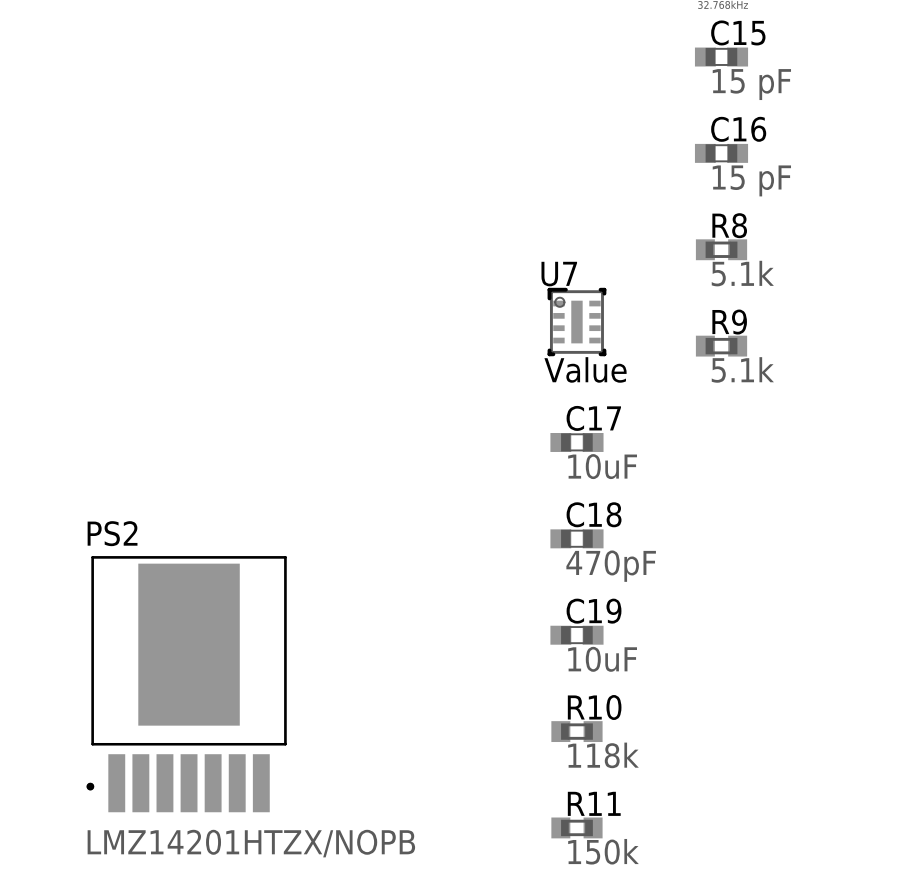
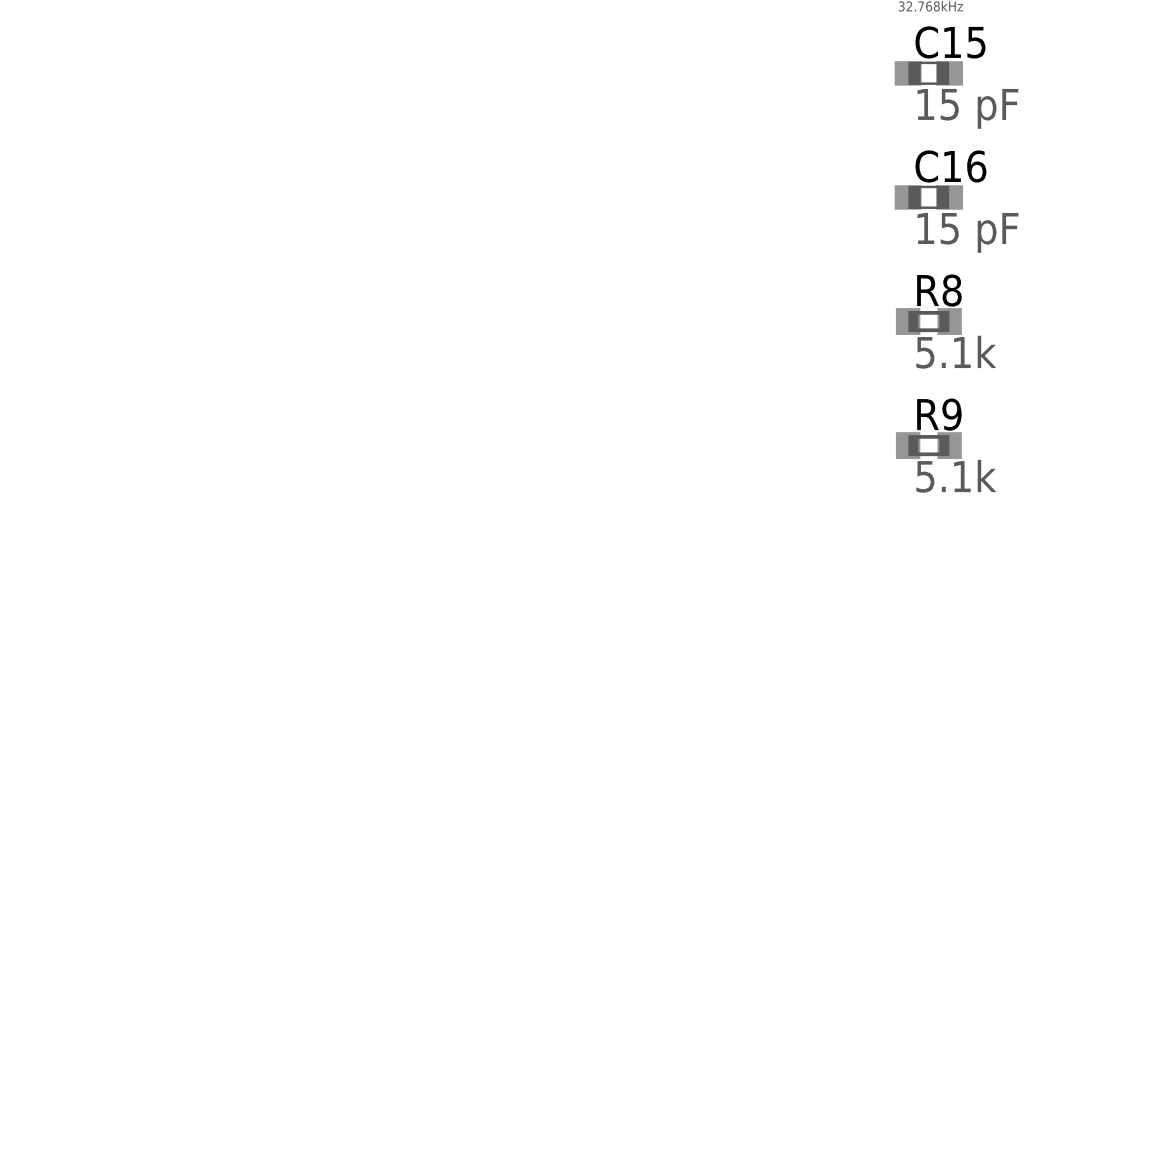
U7: Value (576, 322) -> none
C17: 10uF (576, 442) -> none
C18: 470pF (576, 538) -> none
C19: 10uF (576, 635) -> none
PS2: LMZ14201HTZX/NOPB (186, 684) -> none
R10: 118k (576, 731) -> none
R11: 150k (576, 827) -> none

